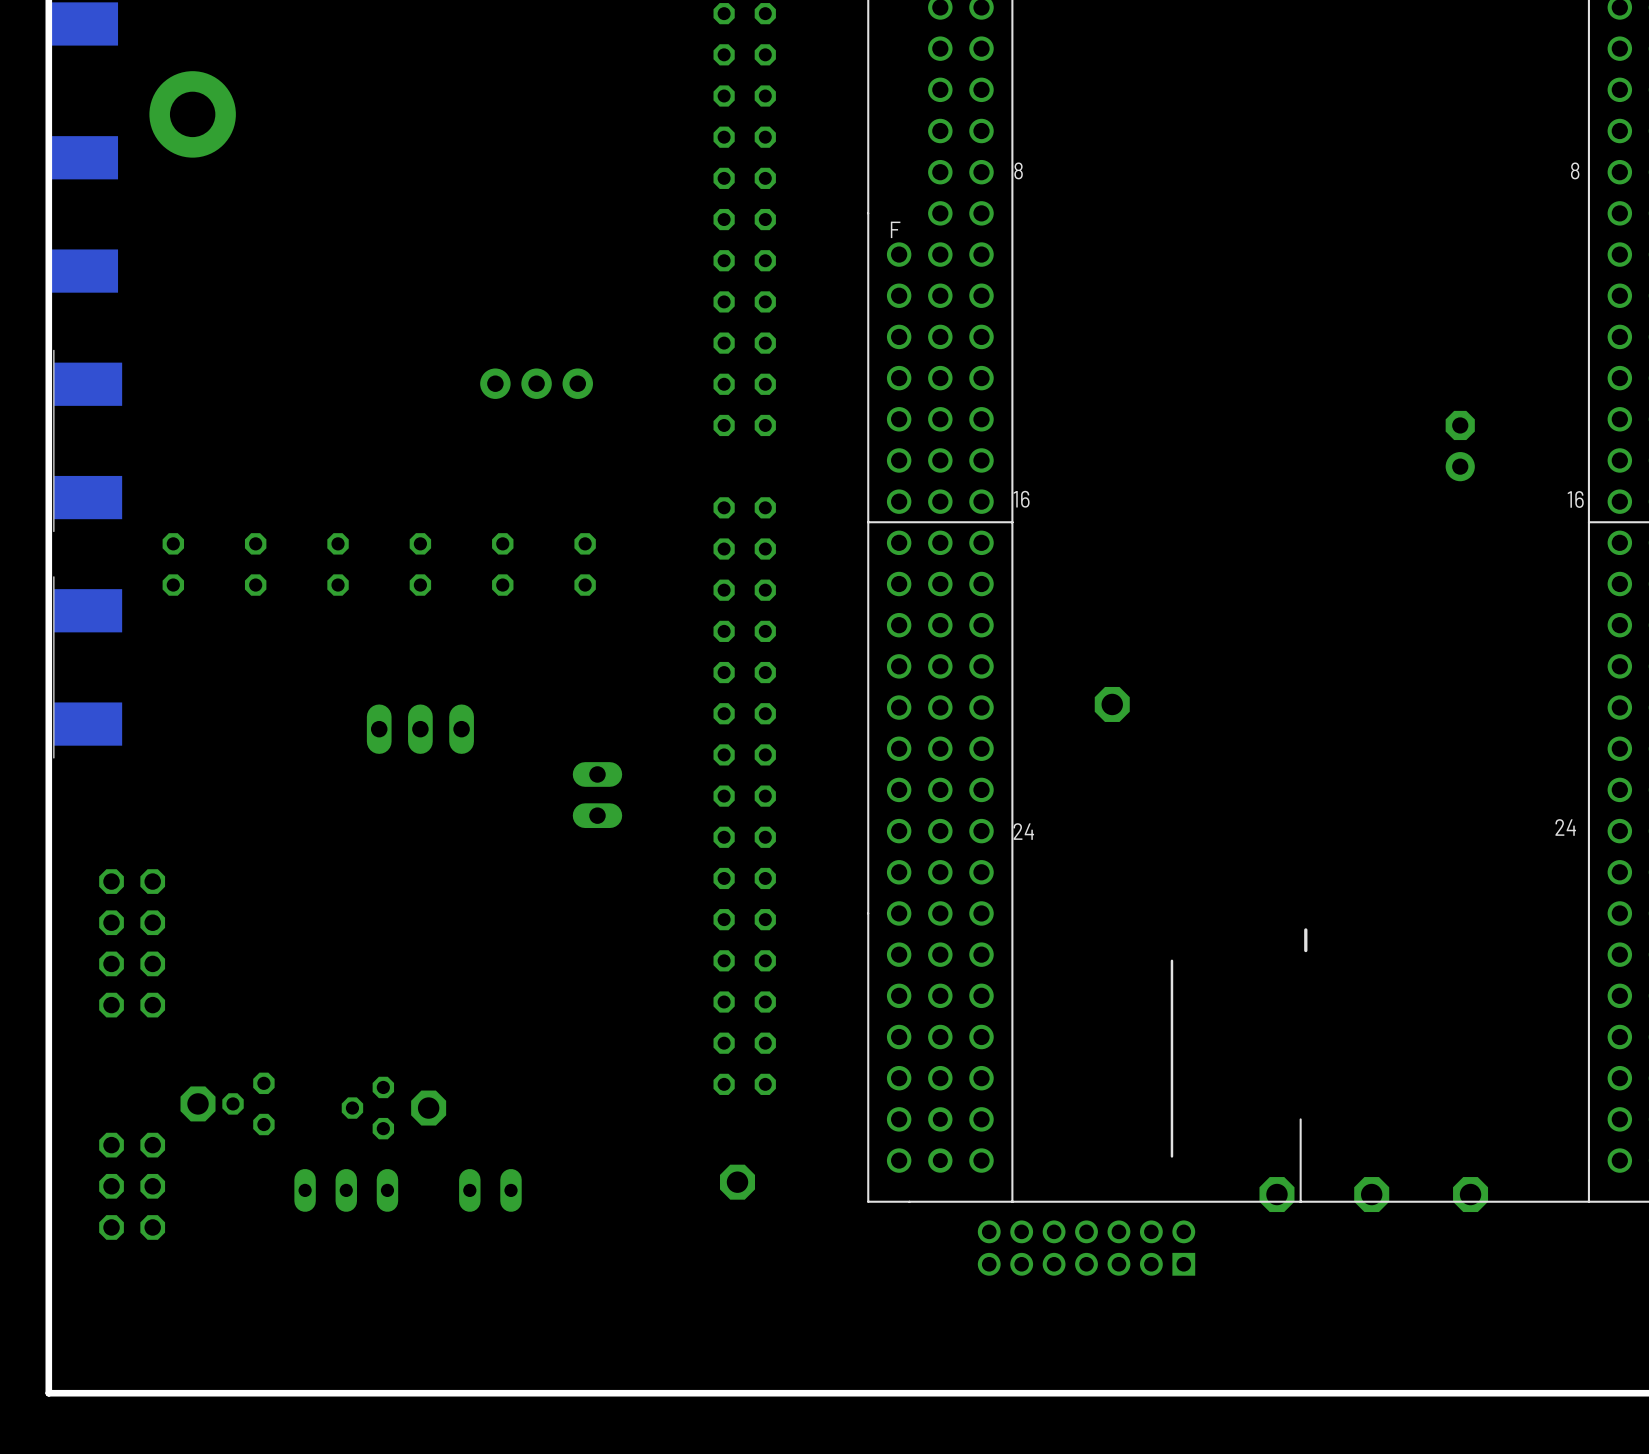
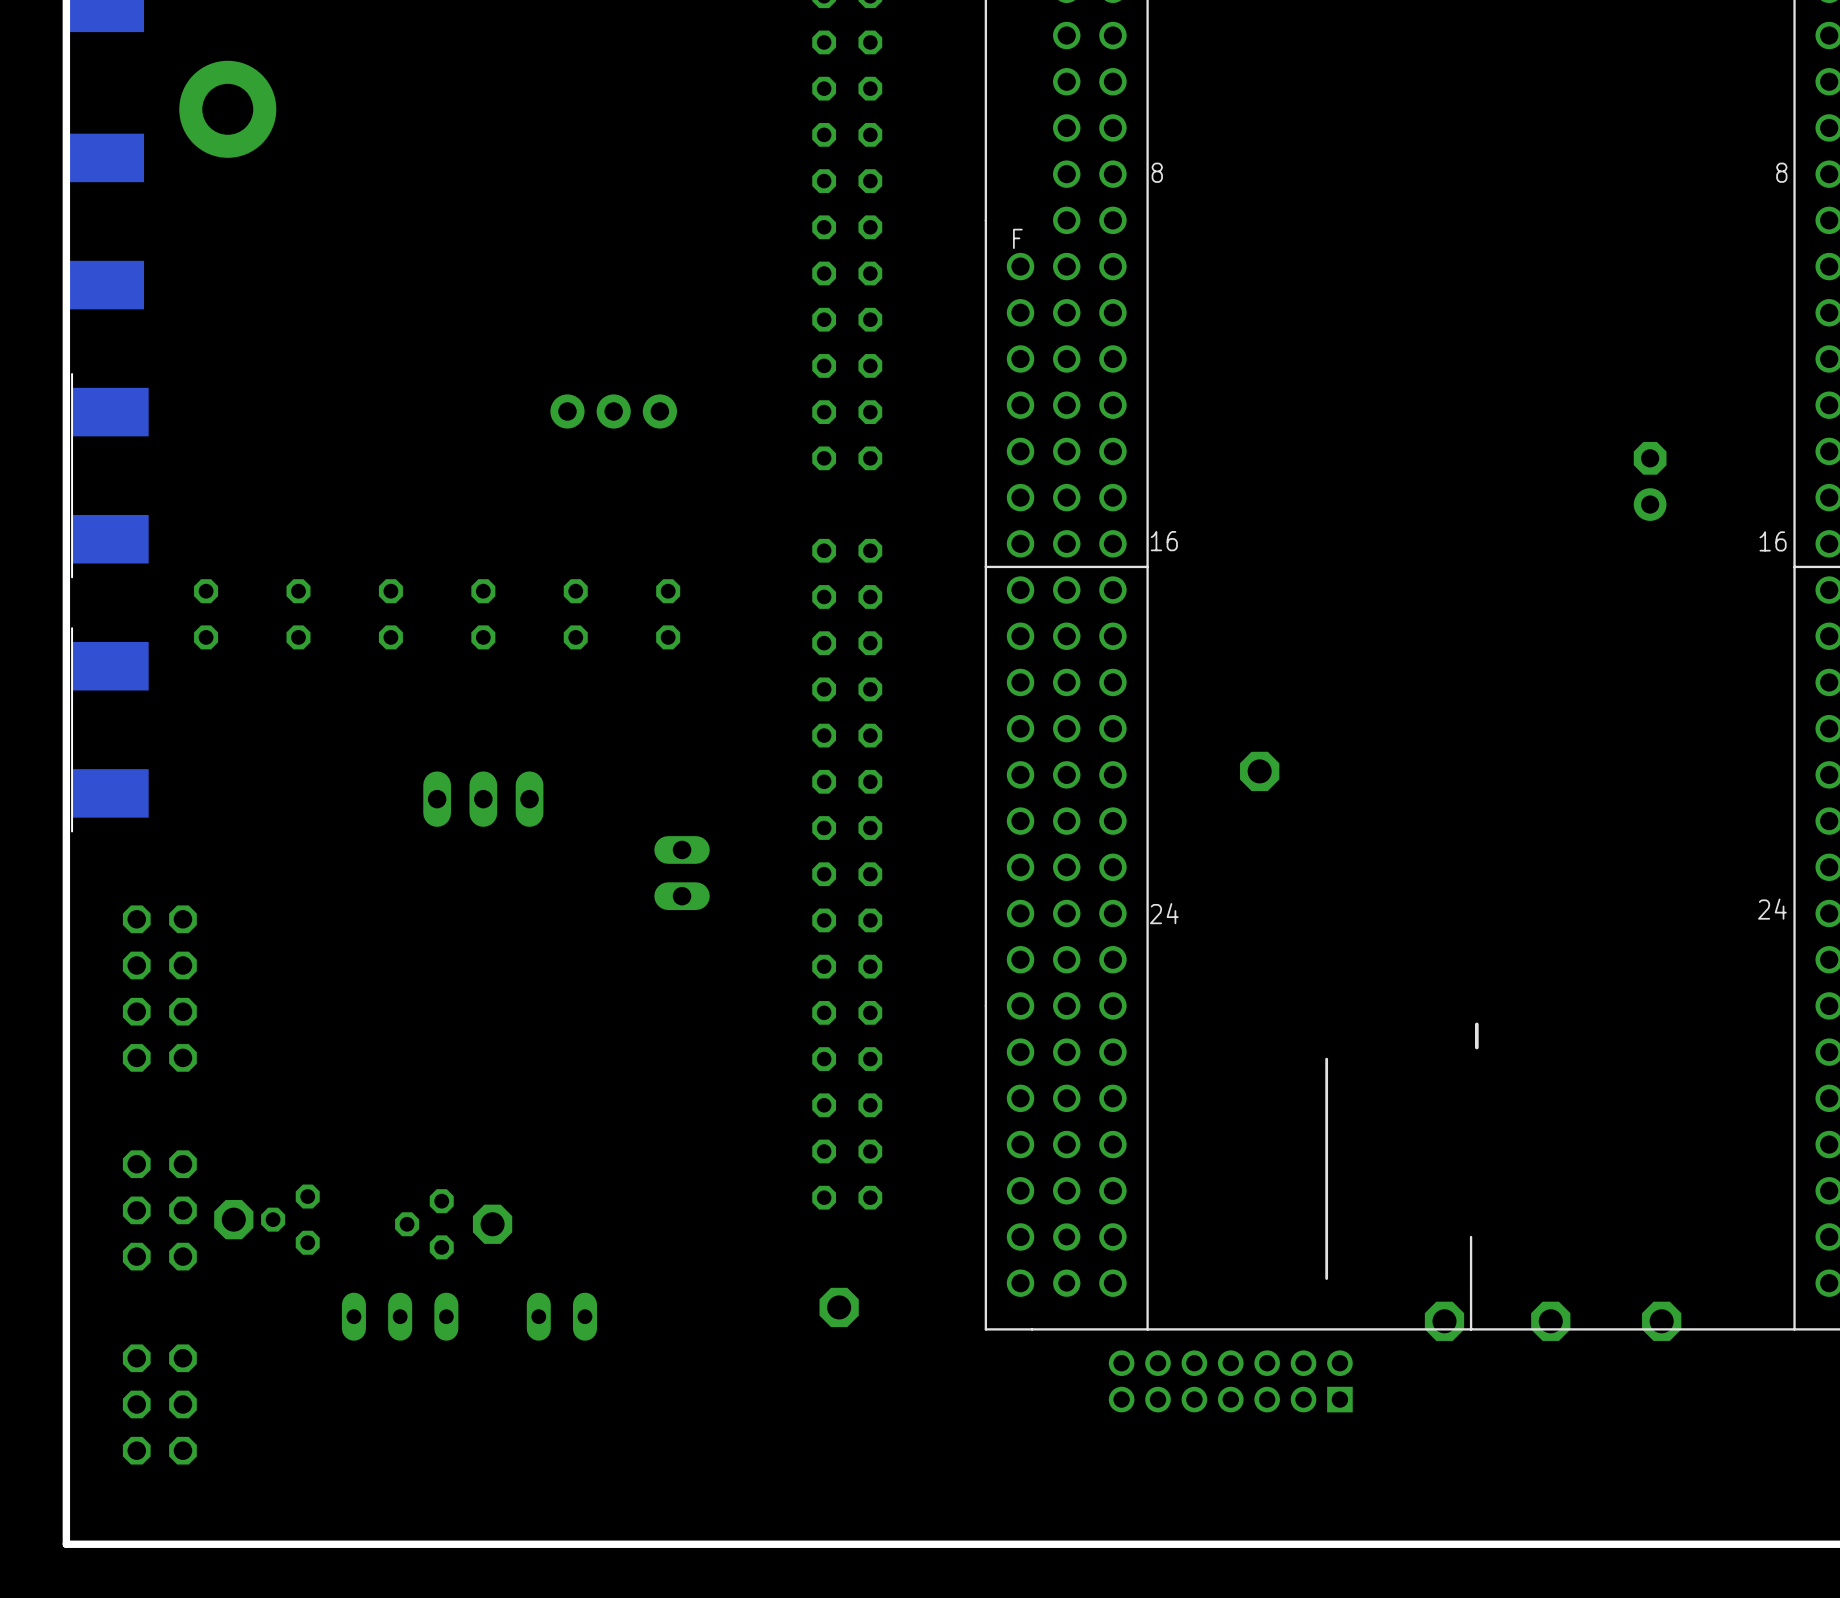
part position: (132, 943) -> (159, 988)
part: none -> (159, 1210)
part: (132, 1186) -> none
part: none -> (159, 1404)

